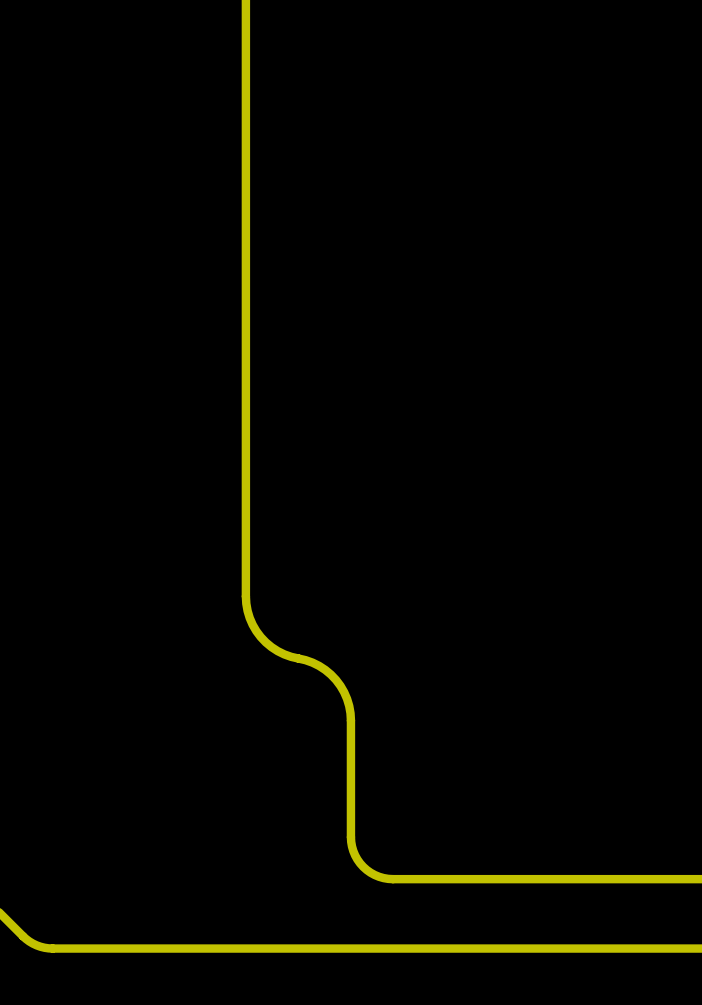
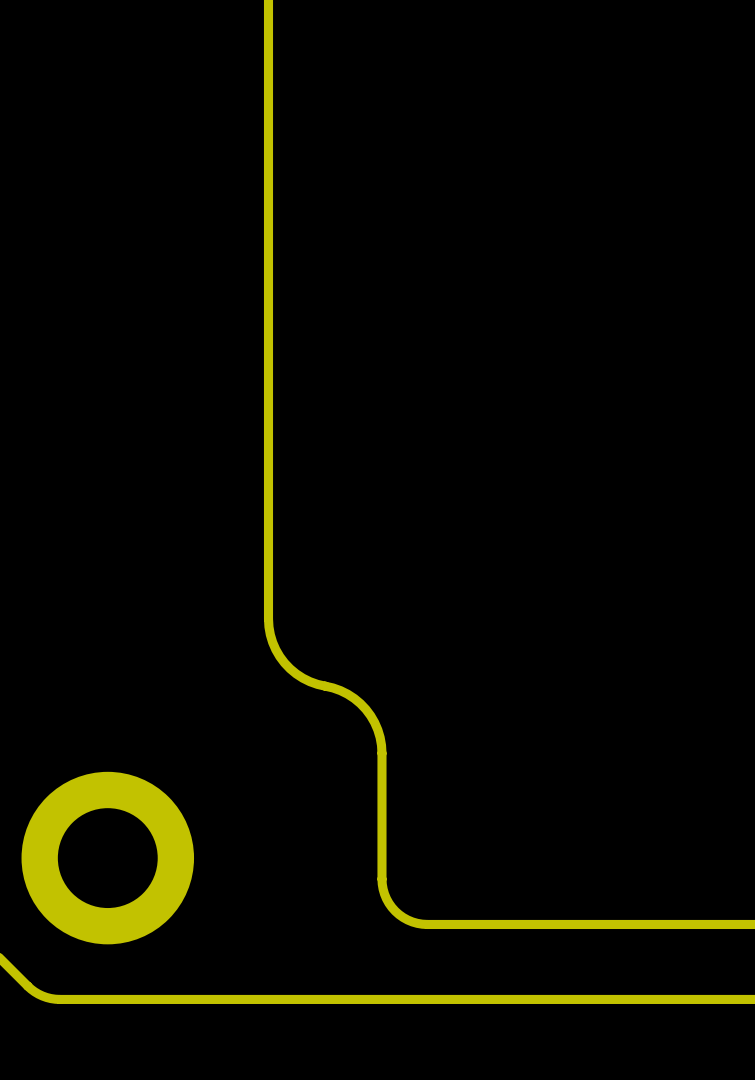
part: none -> (107, 858)

